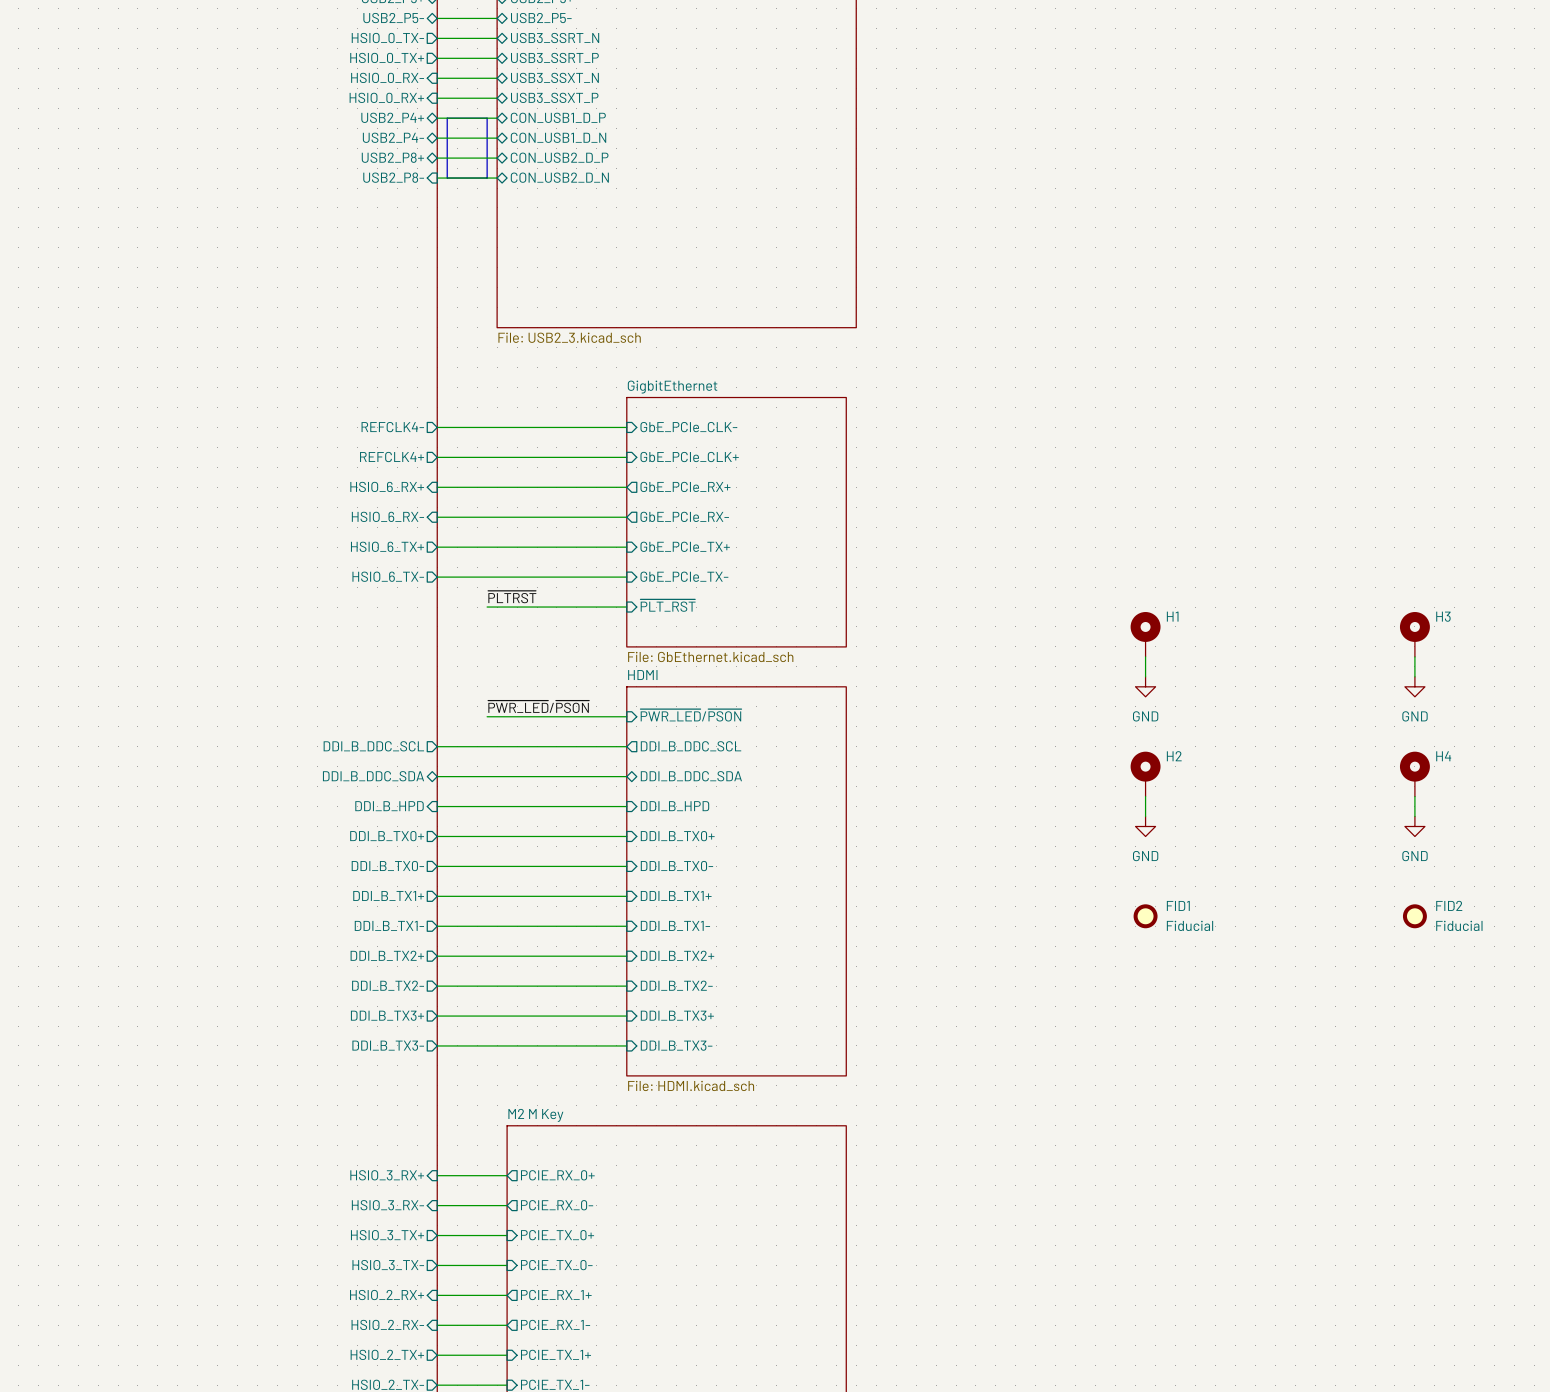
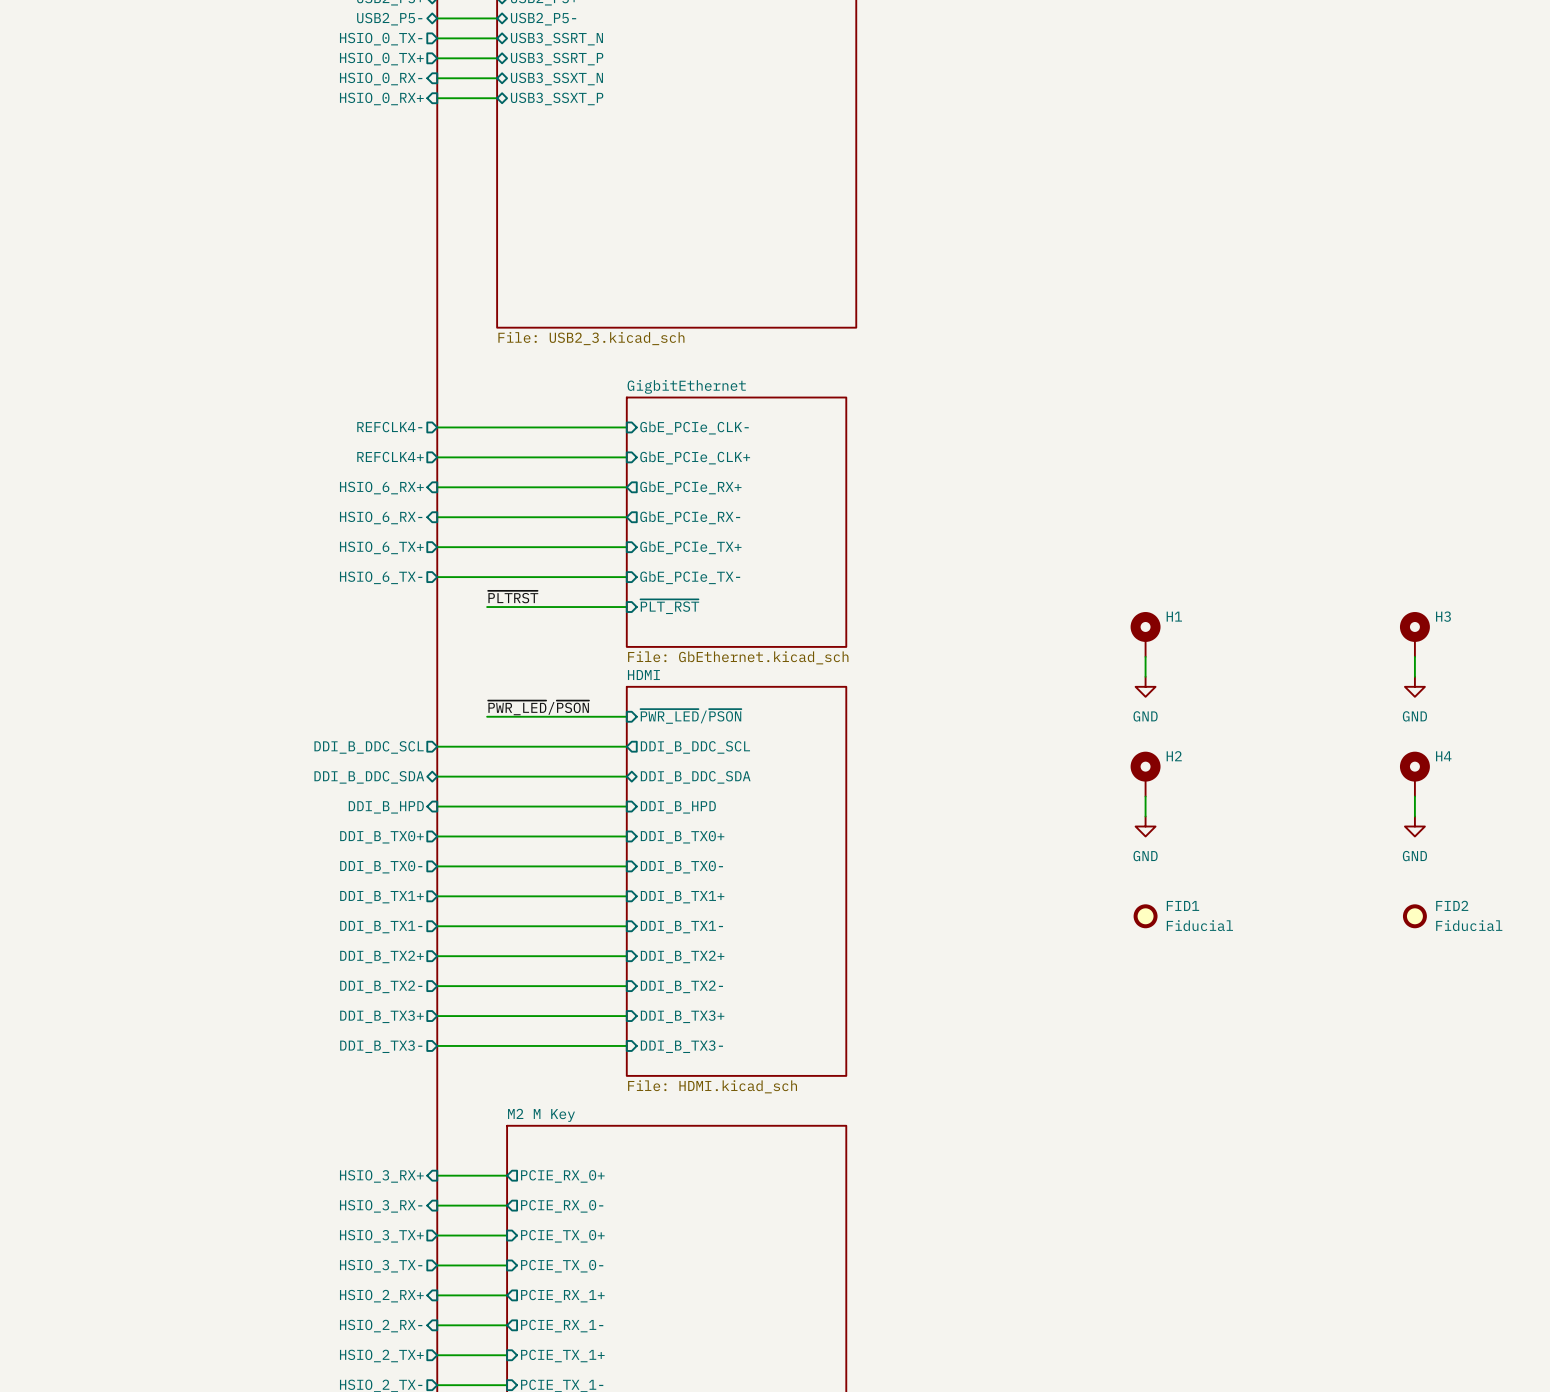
sheet pin: USB2_P4+ (392, 117) -> none
sheet pin: CON_USB1_D_P (558, 117) -> none
wire: (437, 118) (497, 118) -> none
line: (447, 118) (487, 118) (487, 178) (447, 178) (447, 118) -> none
sheet pin: USB2_P4- (393, 137) -> none
sheet pin: CON_USB1_D_N (558, 137) -> none
wire: (437, 138) (497, 138) -> none
sheet pin: USB2_P8+ (392, 157) -> none
sheet pin: CON_USB2_D_P (559, 157) -> none
wire: (437, 158) (497, 158) -> none
sheet pin: USB2_P8- (393, 177) -> none
sheet pin: CON_USB2_D_N (559, 177) -> none
wire: (437, 178) (497, 178) -> none

